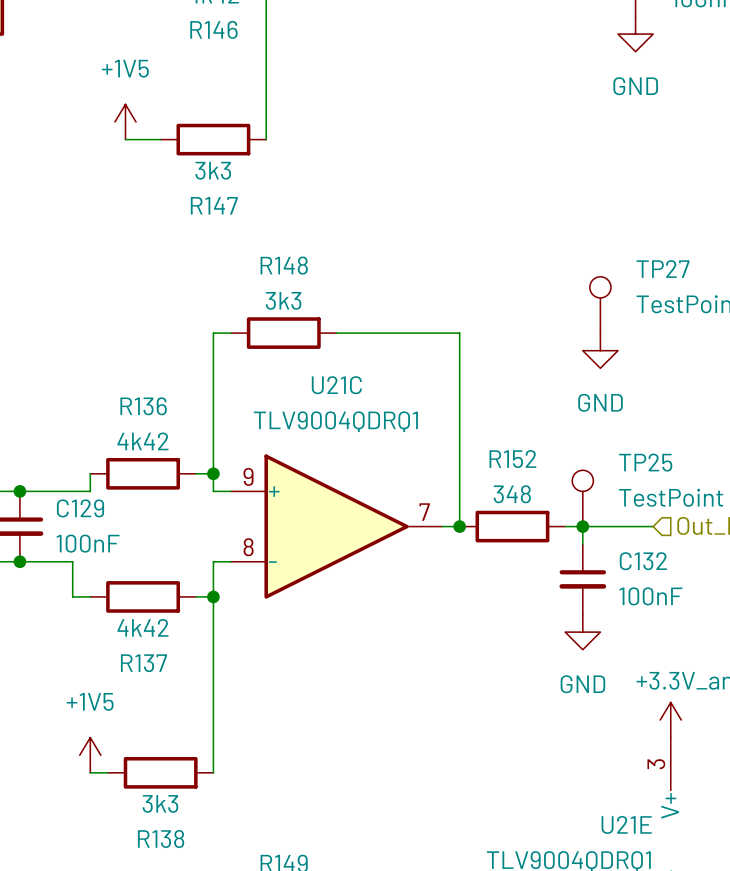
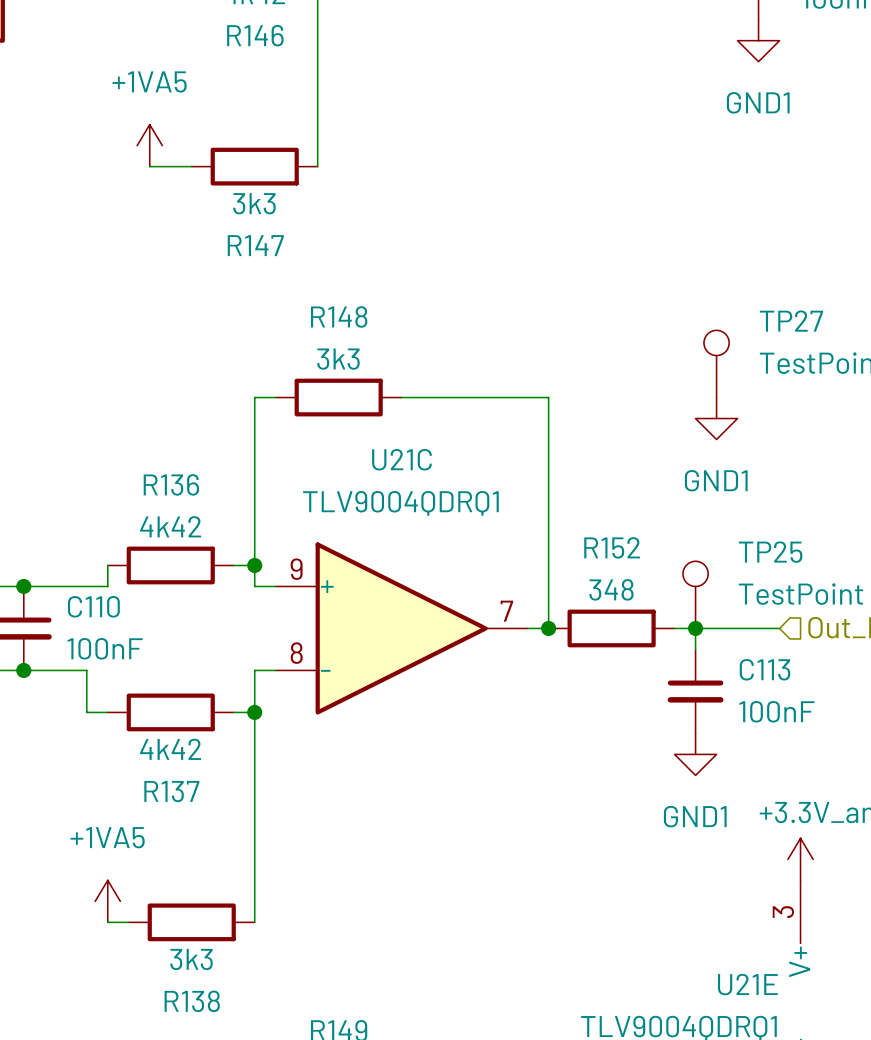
power symbol: GND (635, 34) -> GND1 (758, 40)
power symbol: +1V5 (125, 122) -> +1VA5 (149, 145)
power symbol: GND (600, 350) -> GND1 (716, 418)
C129 name: C129 (80, 508) -> C110 (93, 606)
C132 name: C132 (643, 561) -> C113 (764, 669)
power symbol: GND (582, 632) -> GND1 (695, 754)
power symbol: +1V5 (90, 755) -> +1VA5 (107, 901)

